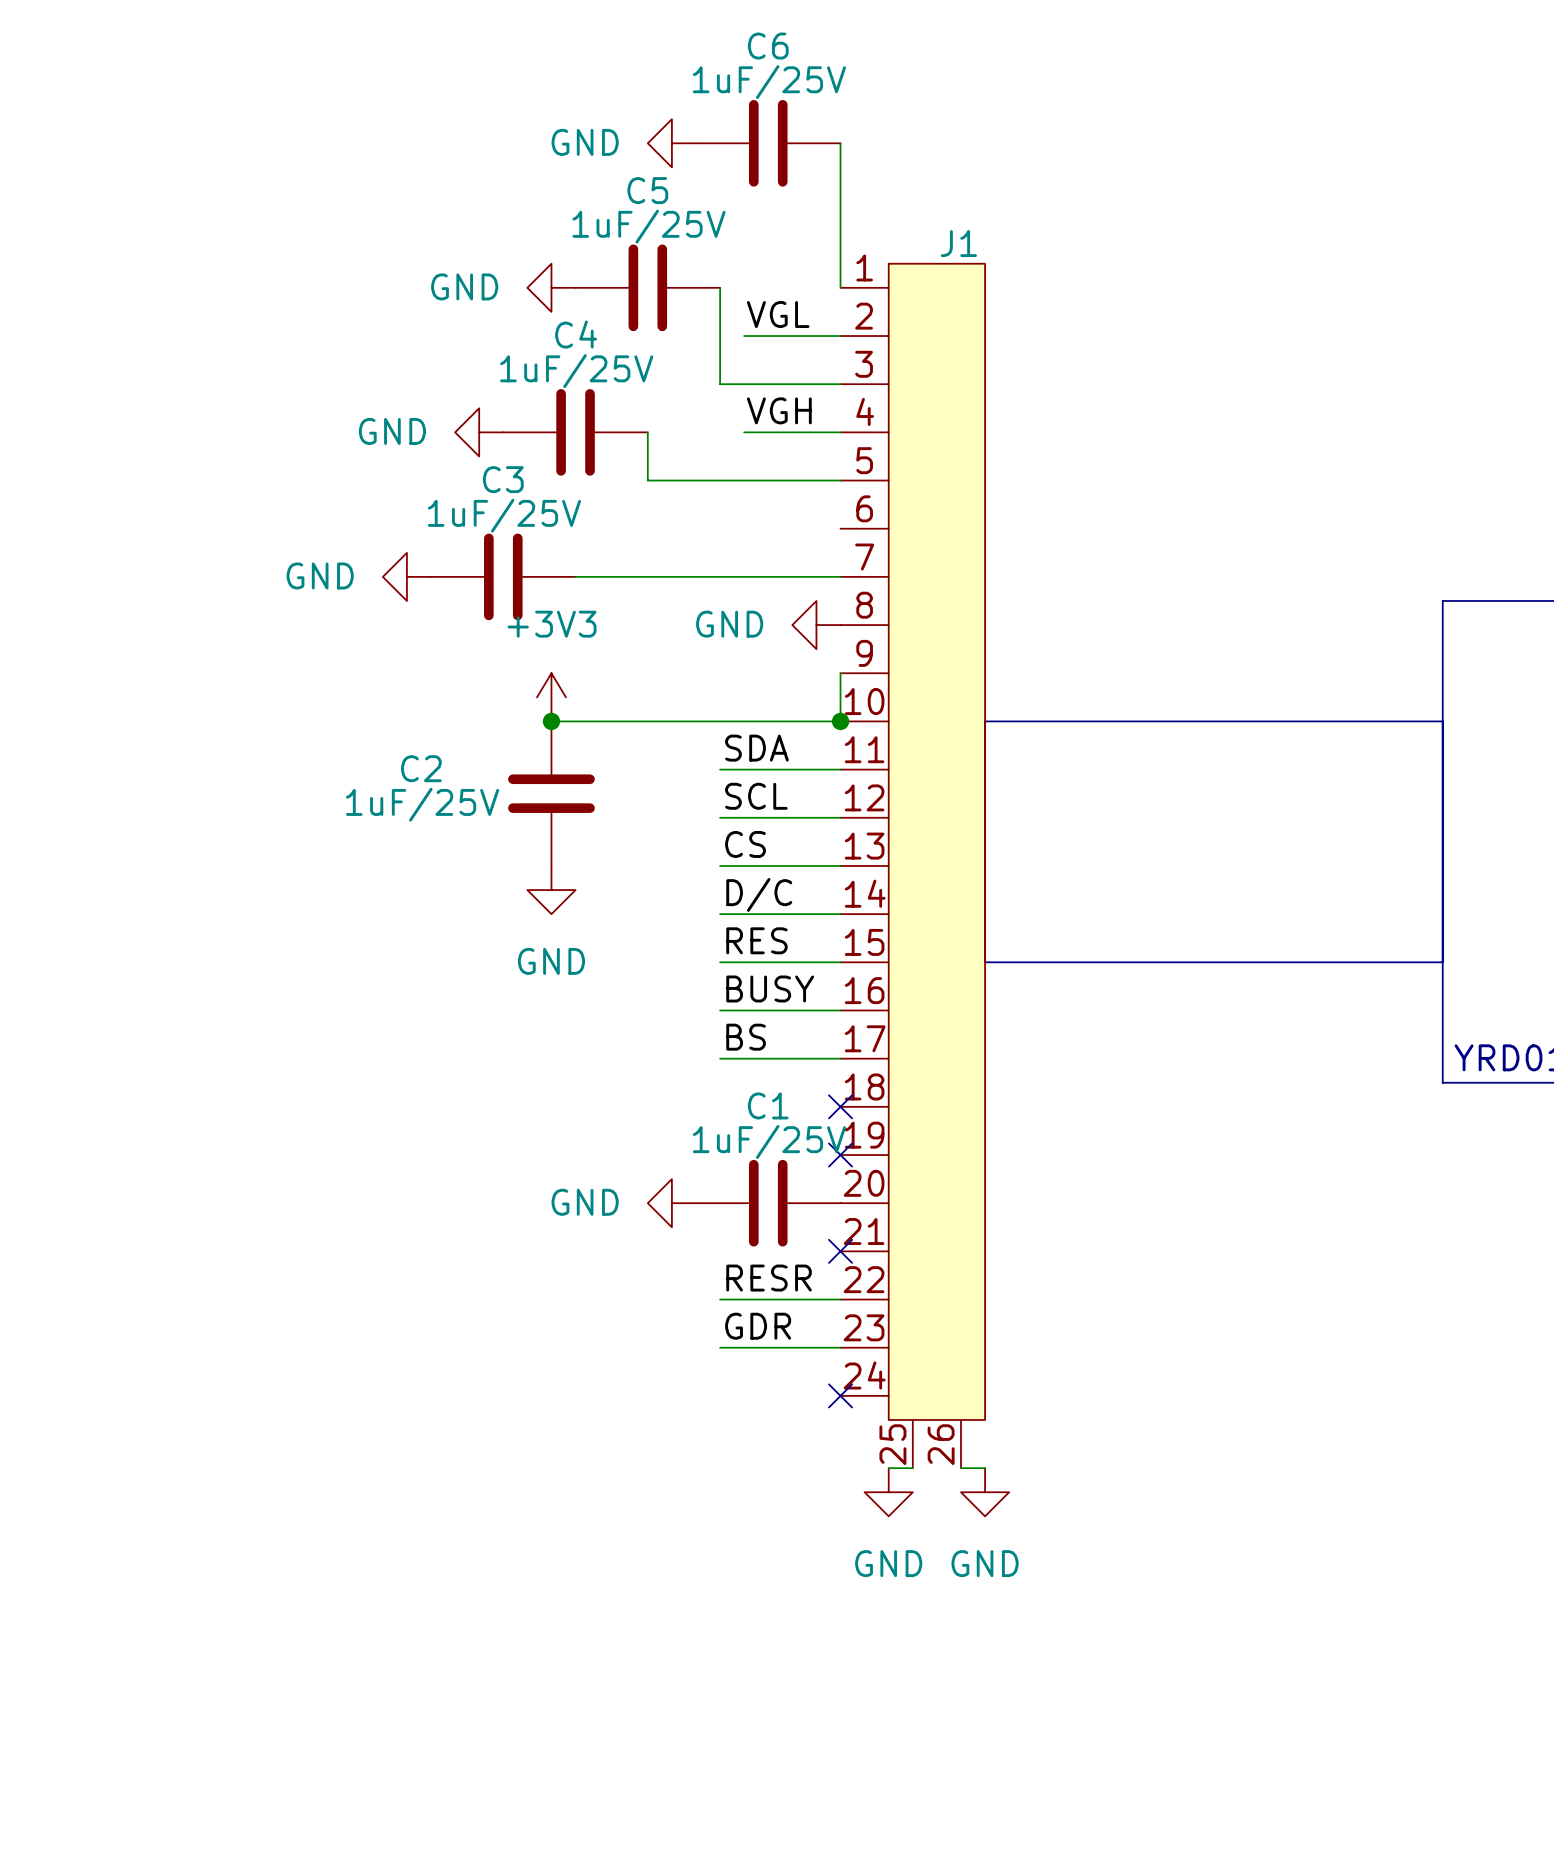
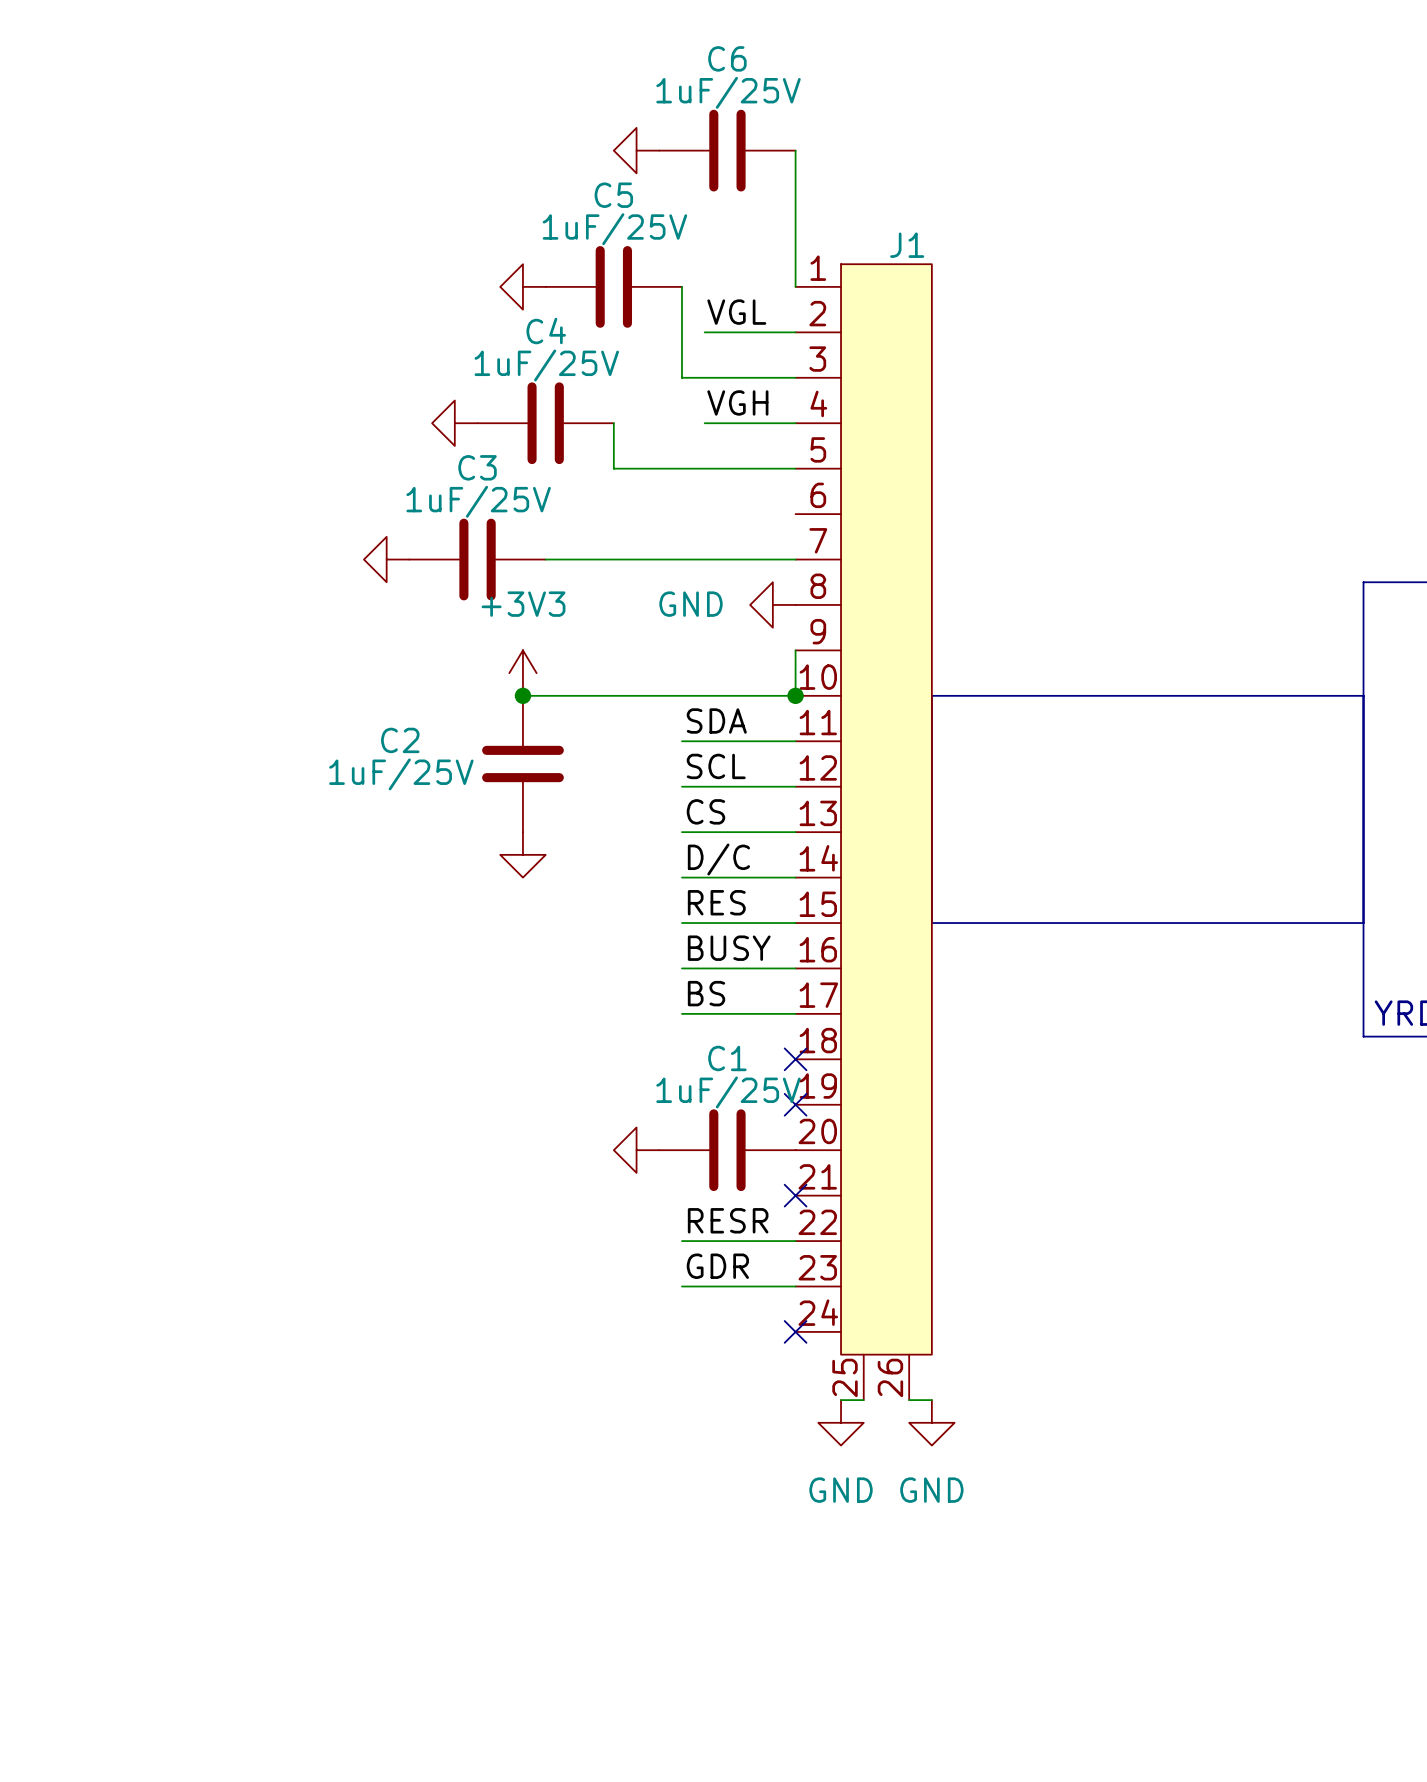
power symbol text: GND (585, 142) -> none
power symbol text: GND (464, 286) -> none
power symbol text: GND (392, 431) -> none
power symbol text: GND (320, 575) -> none
power symbol text: GND (551, 961) -> none
power symbol text: GND (585, 1202) -> none

